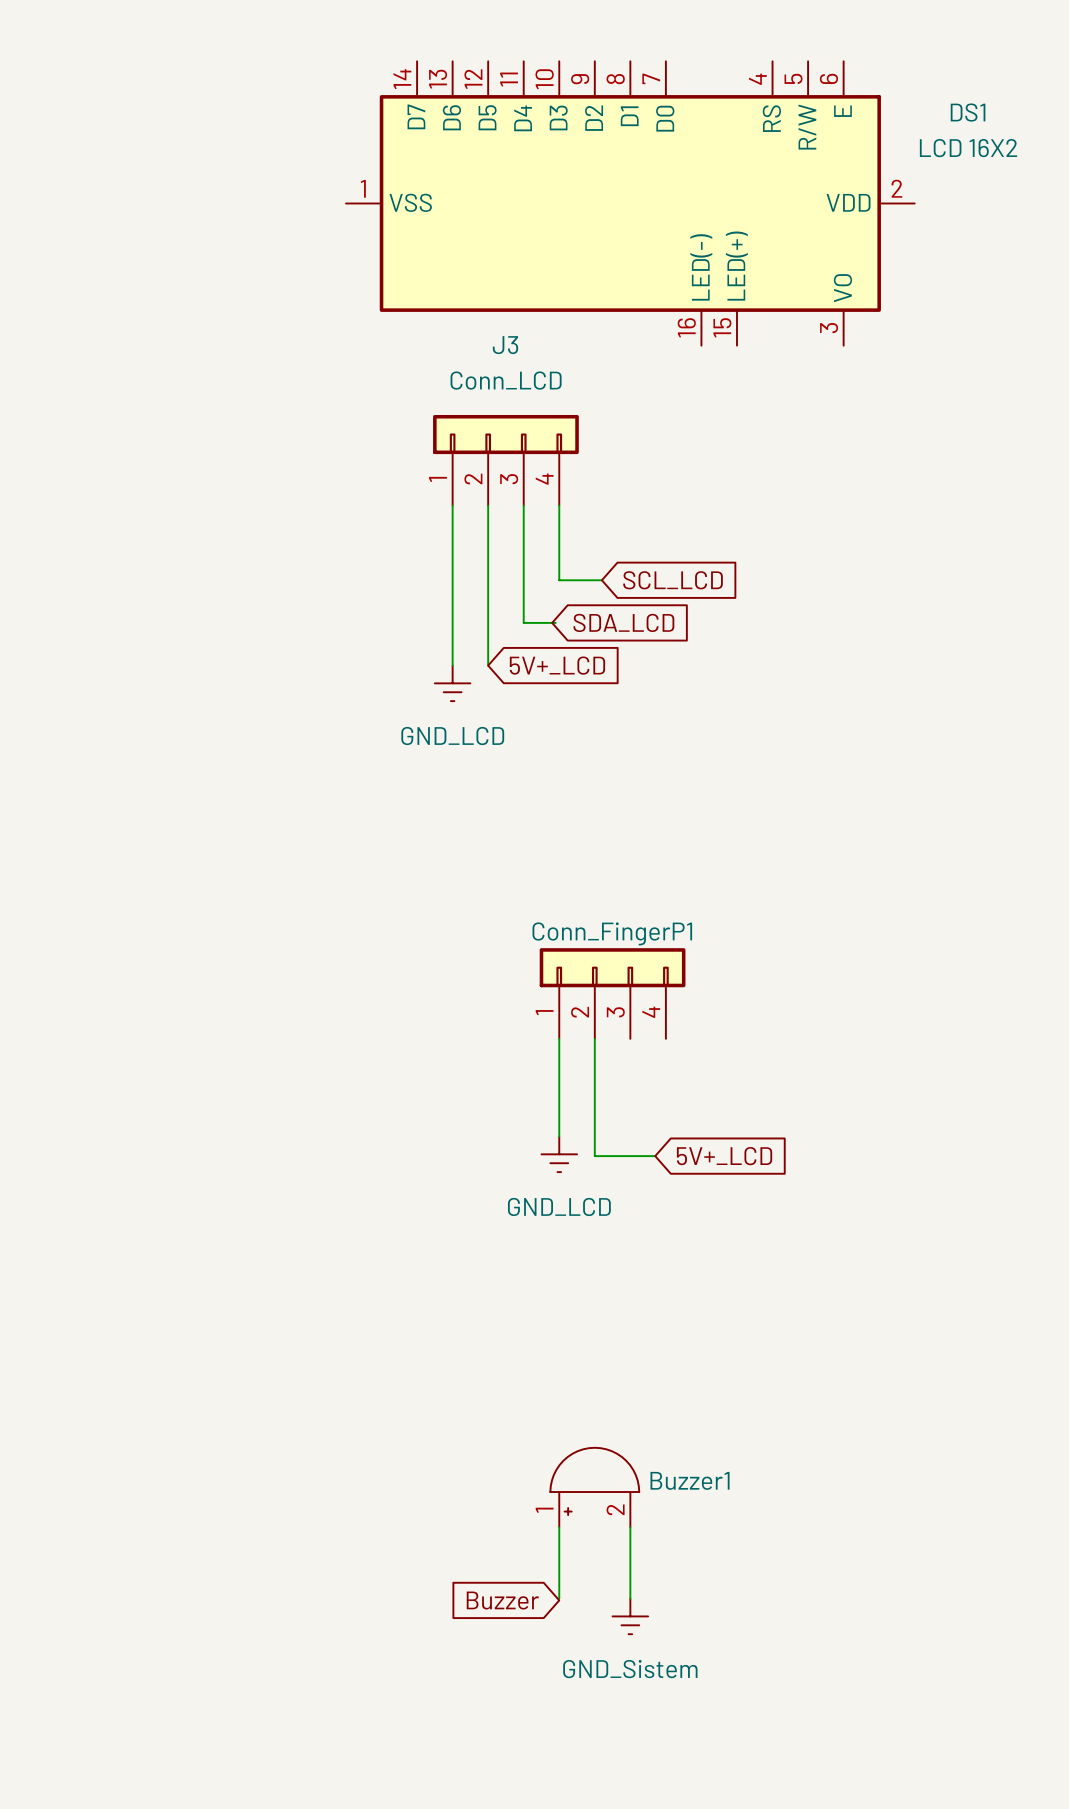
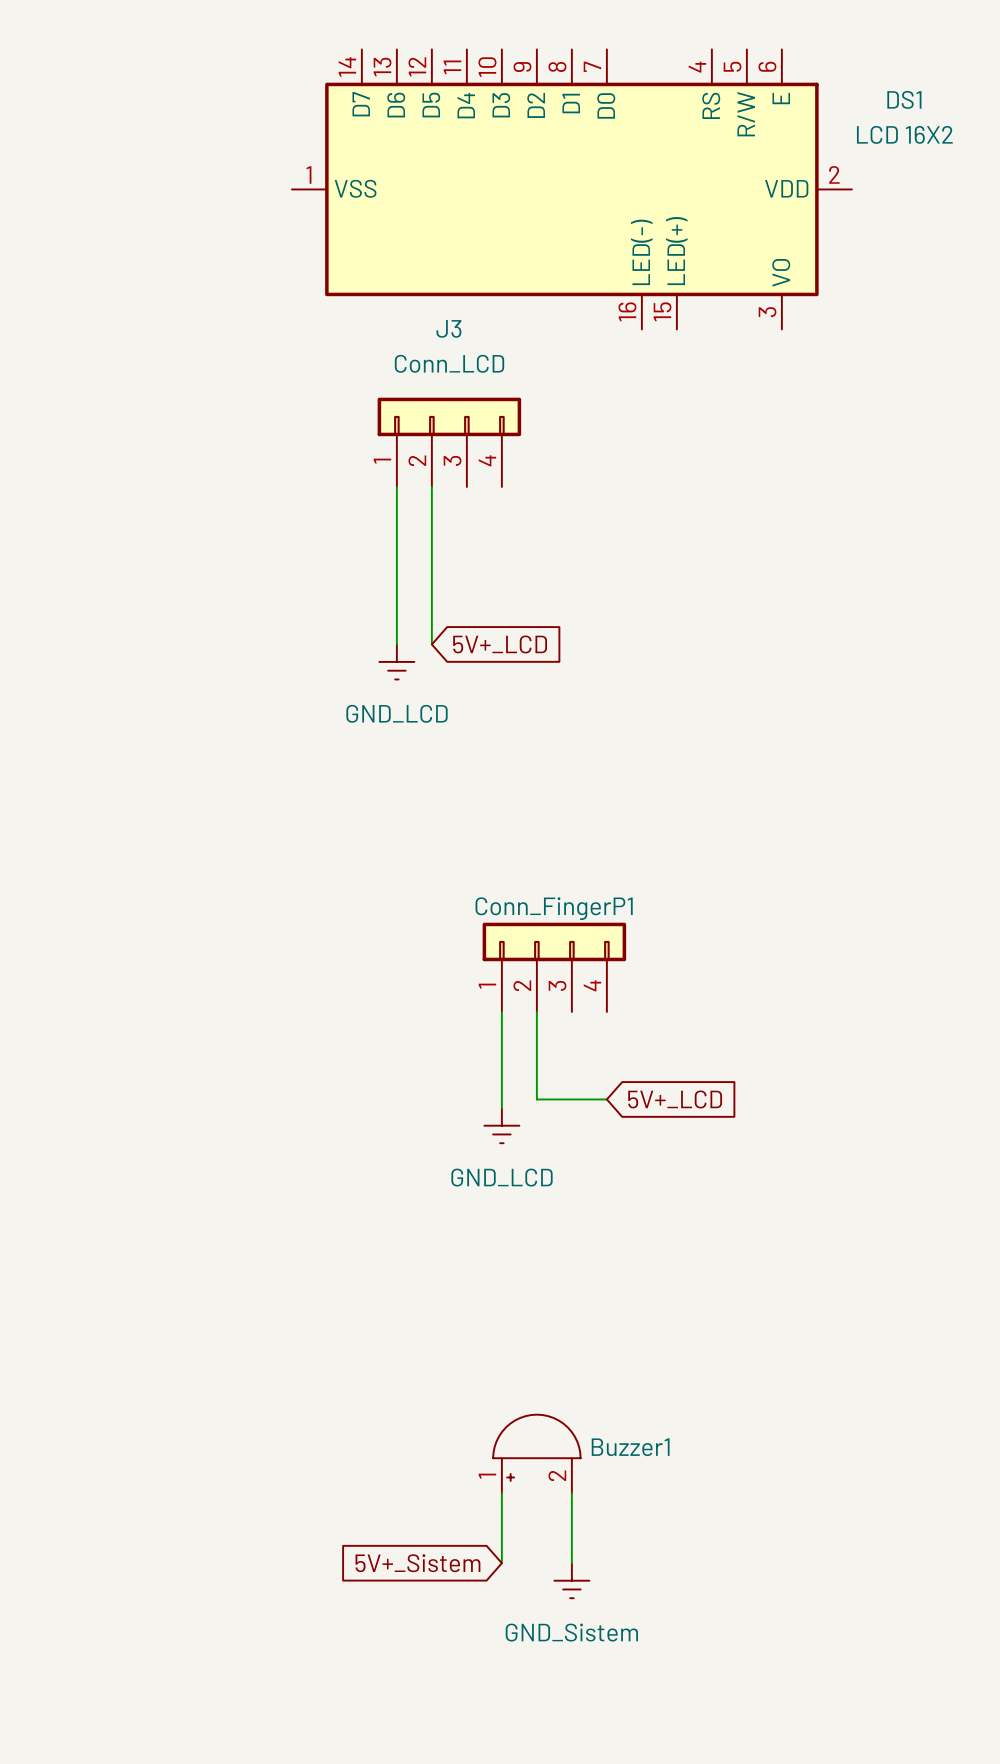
wire: (523, 505) (523, 622) (555, 622) -> none
wire: (559, 505) (559, 580) (601, 580) -> none
global label: SCL_LCD (673, 580) -> none
global label: SDA_LCD (623, 622) -> none
wire: (594, 1127) (594, 1156) (655, 1156) -> (536, 1099) (606, 1099)
global label position: 5V+_LCD (724, 1156) -> 5V+_LCD (675, 1099)
global label: Buzzer (502, 1600) -> 5V+_Sistem (417, 1563)

